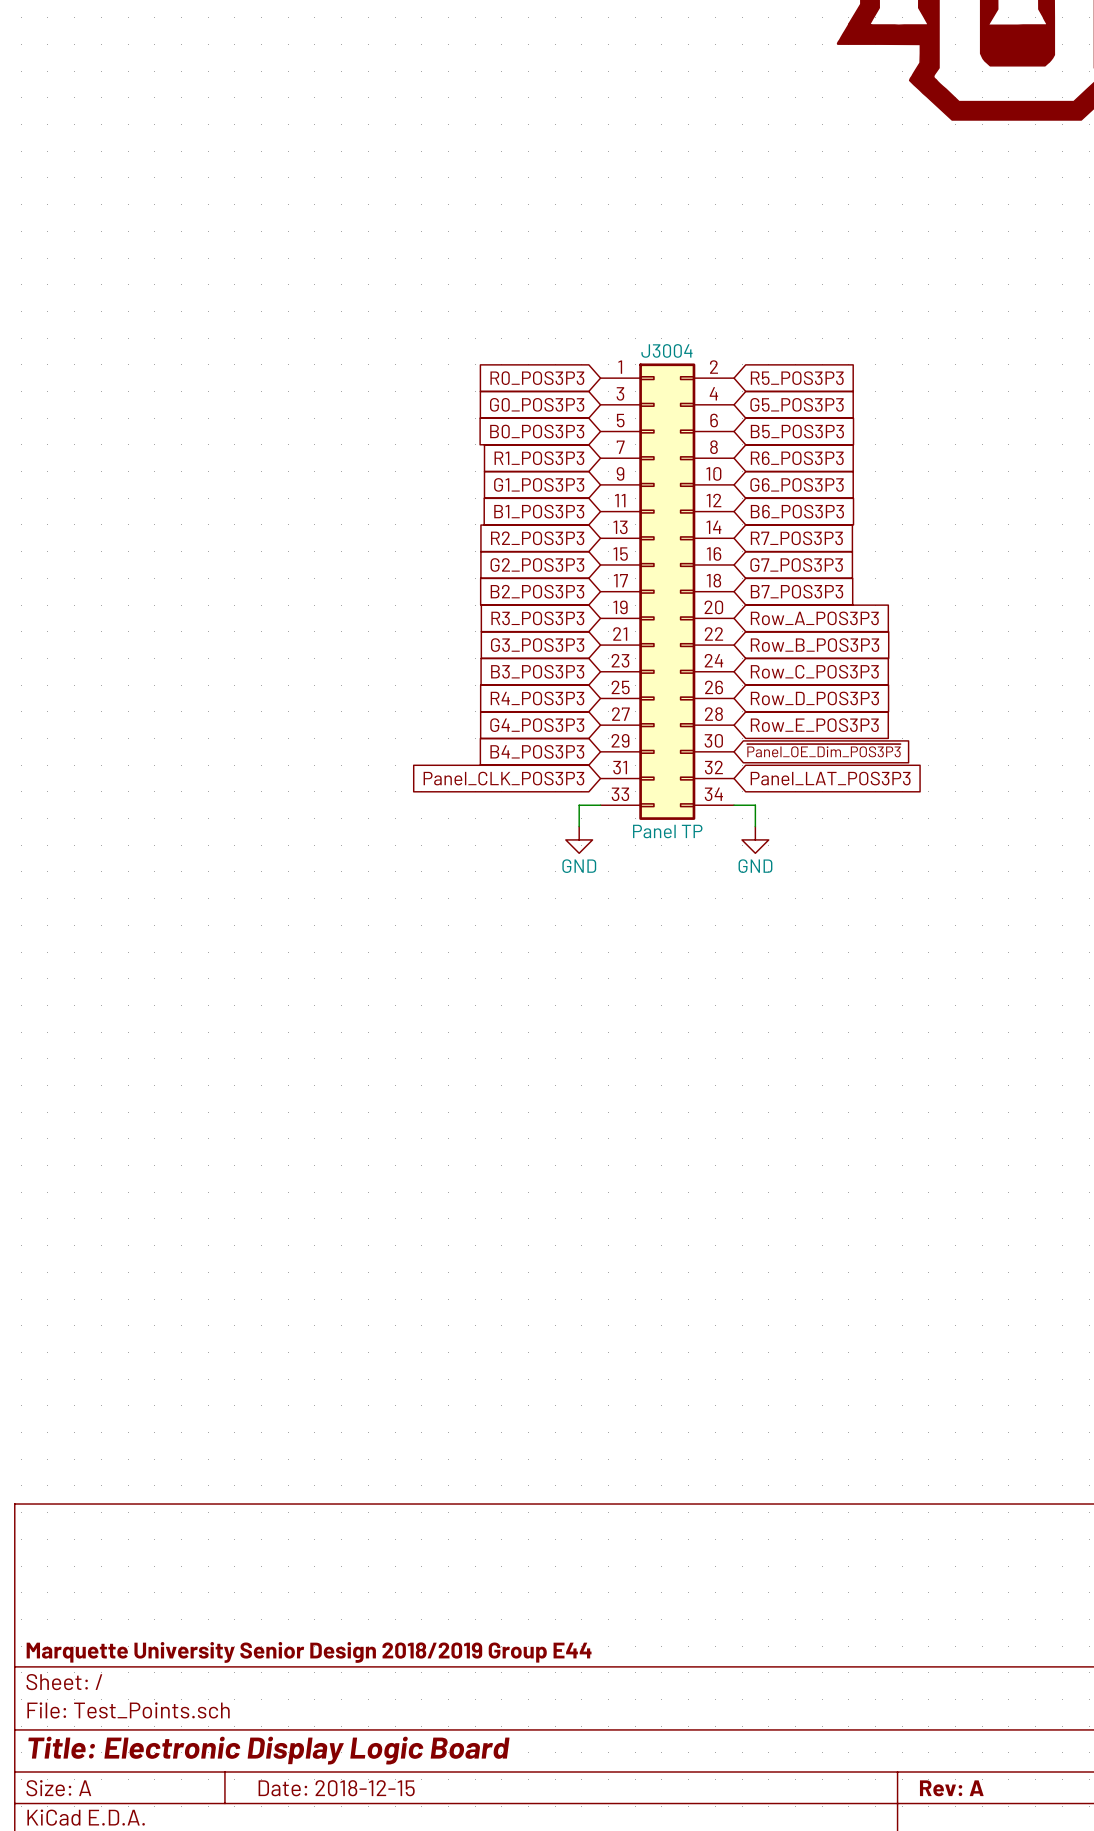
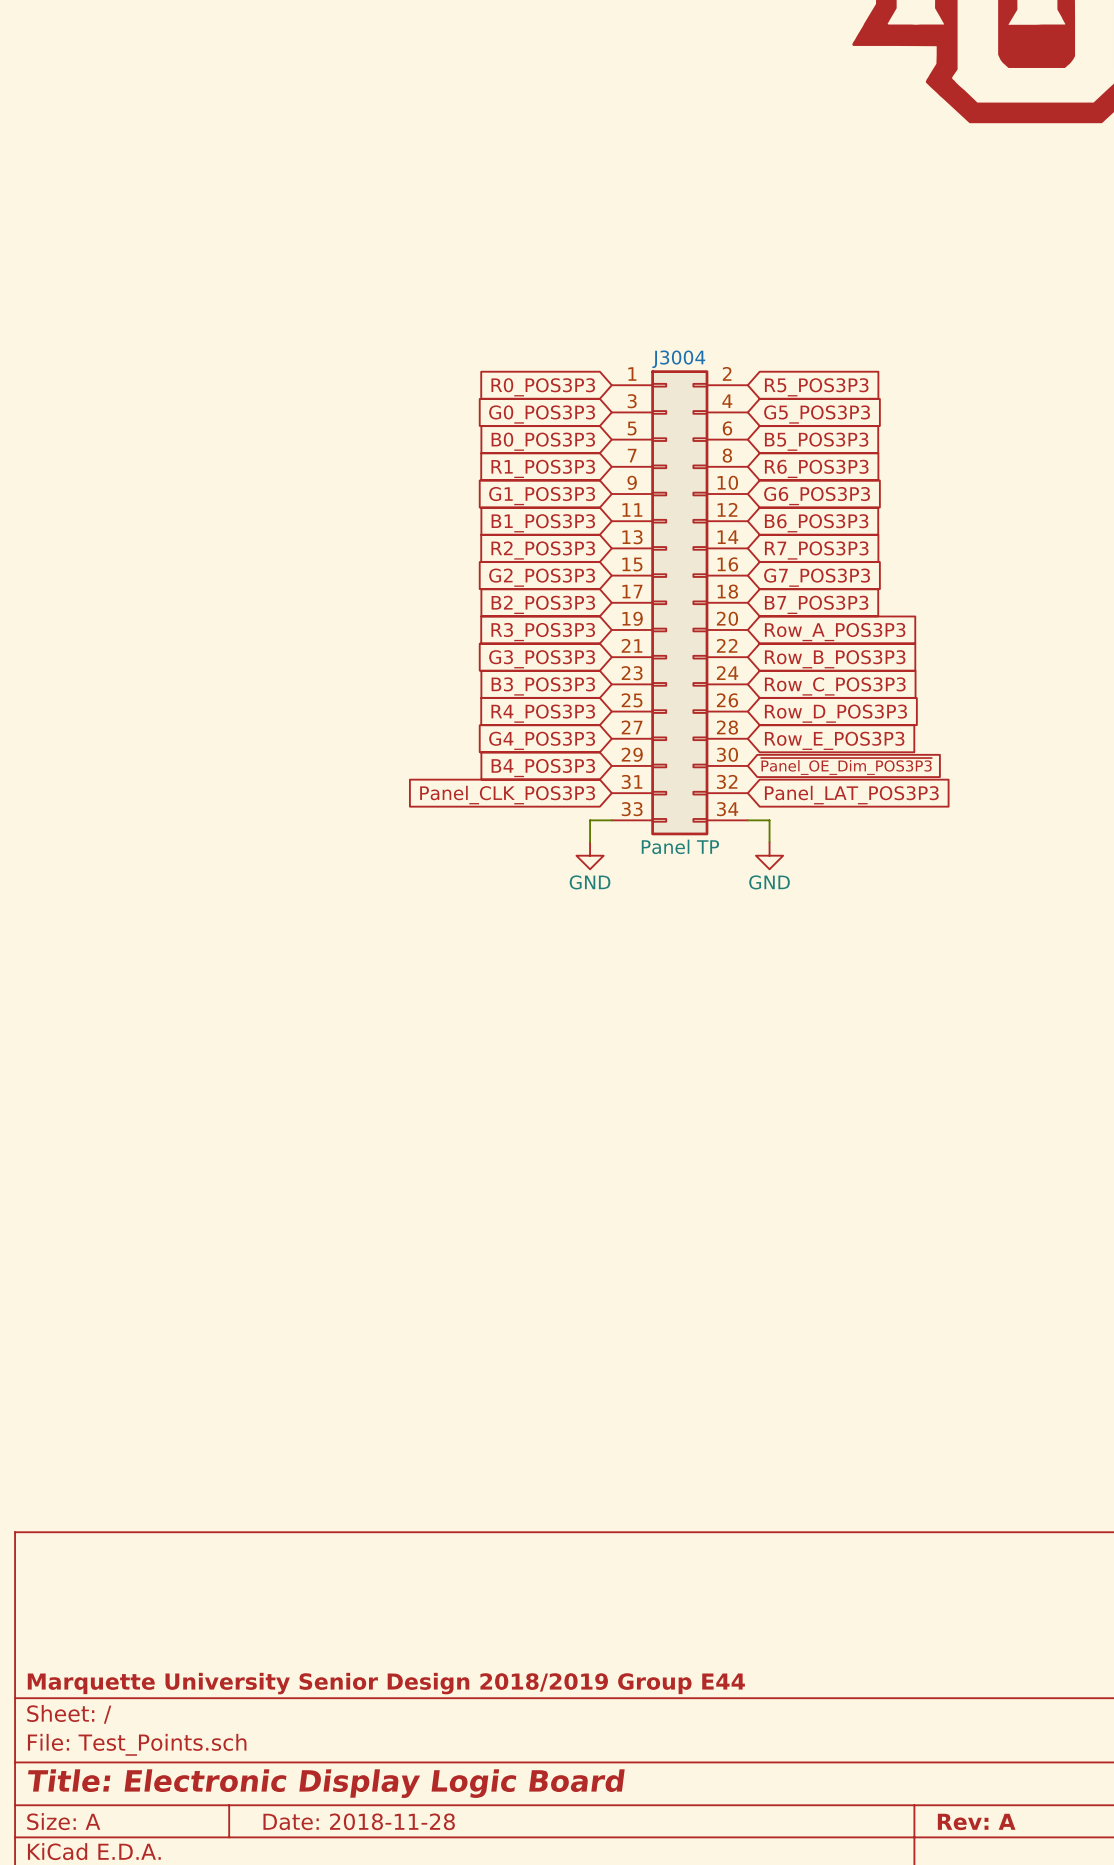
title block: Date: 2018-12-15 (336, 1788) -> Date: 2018-11-28 (359, 1821)

